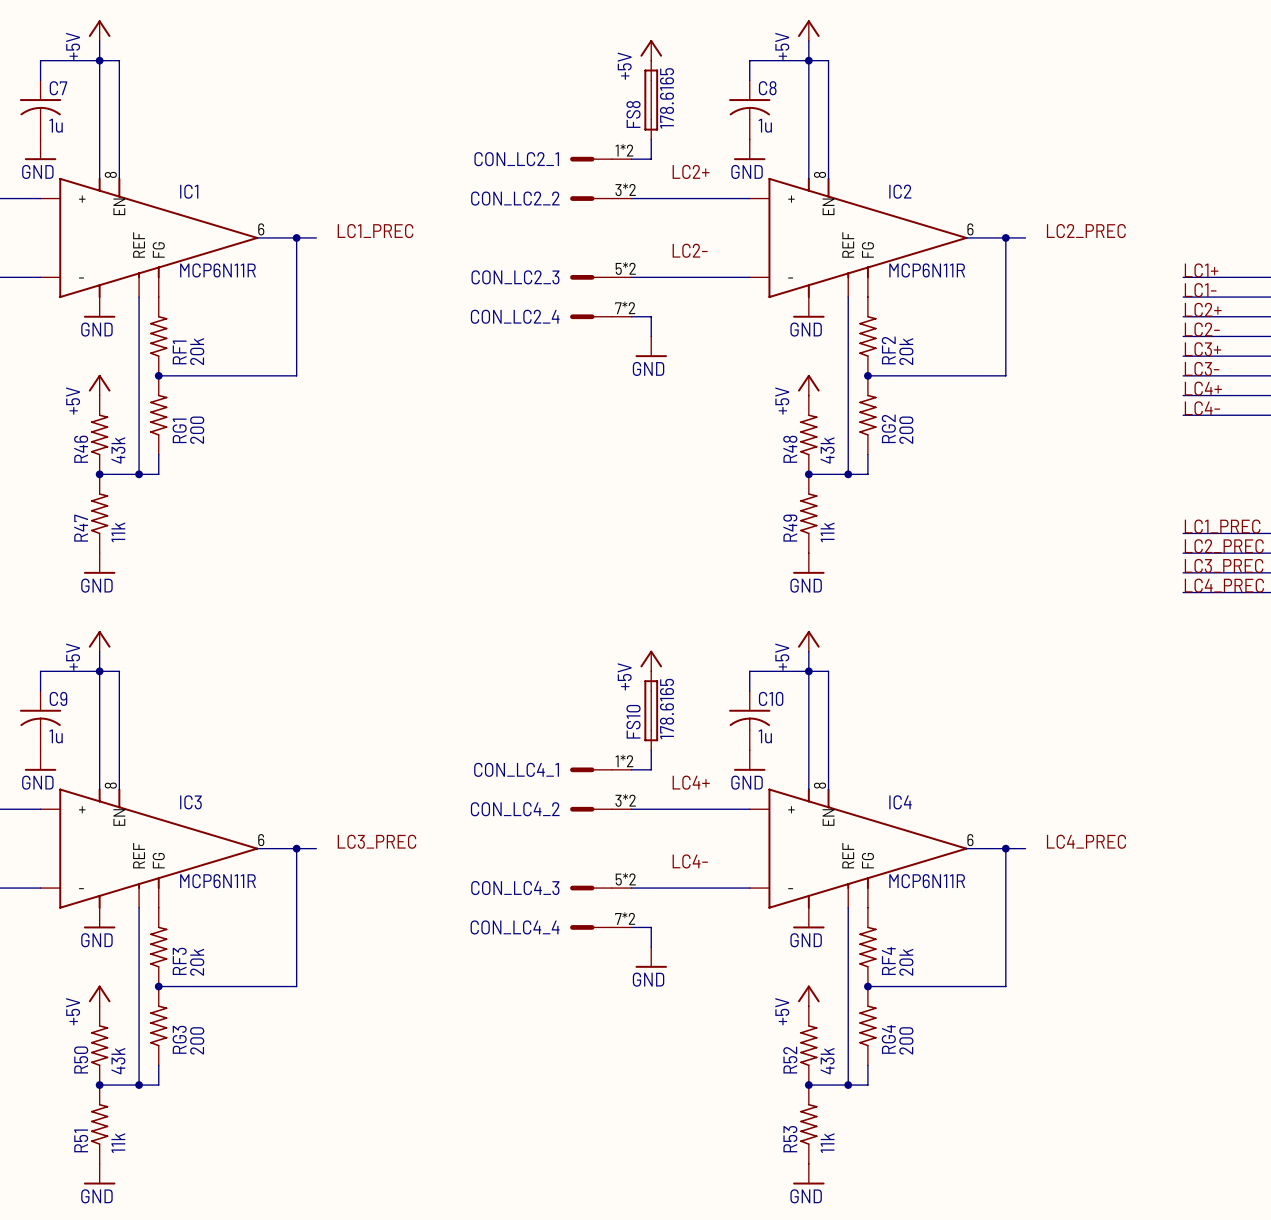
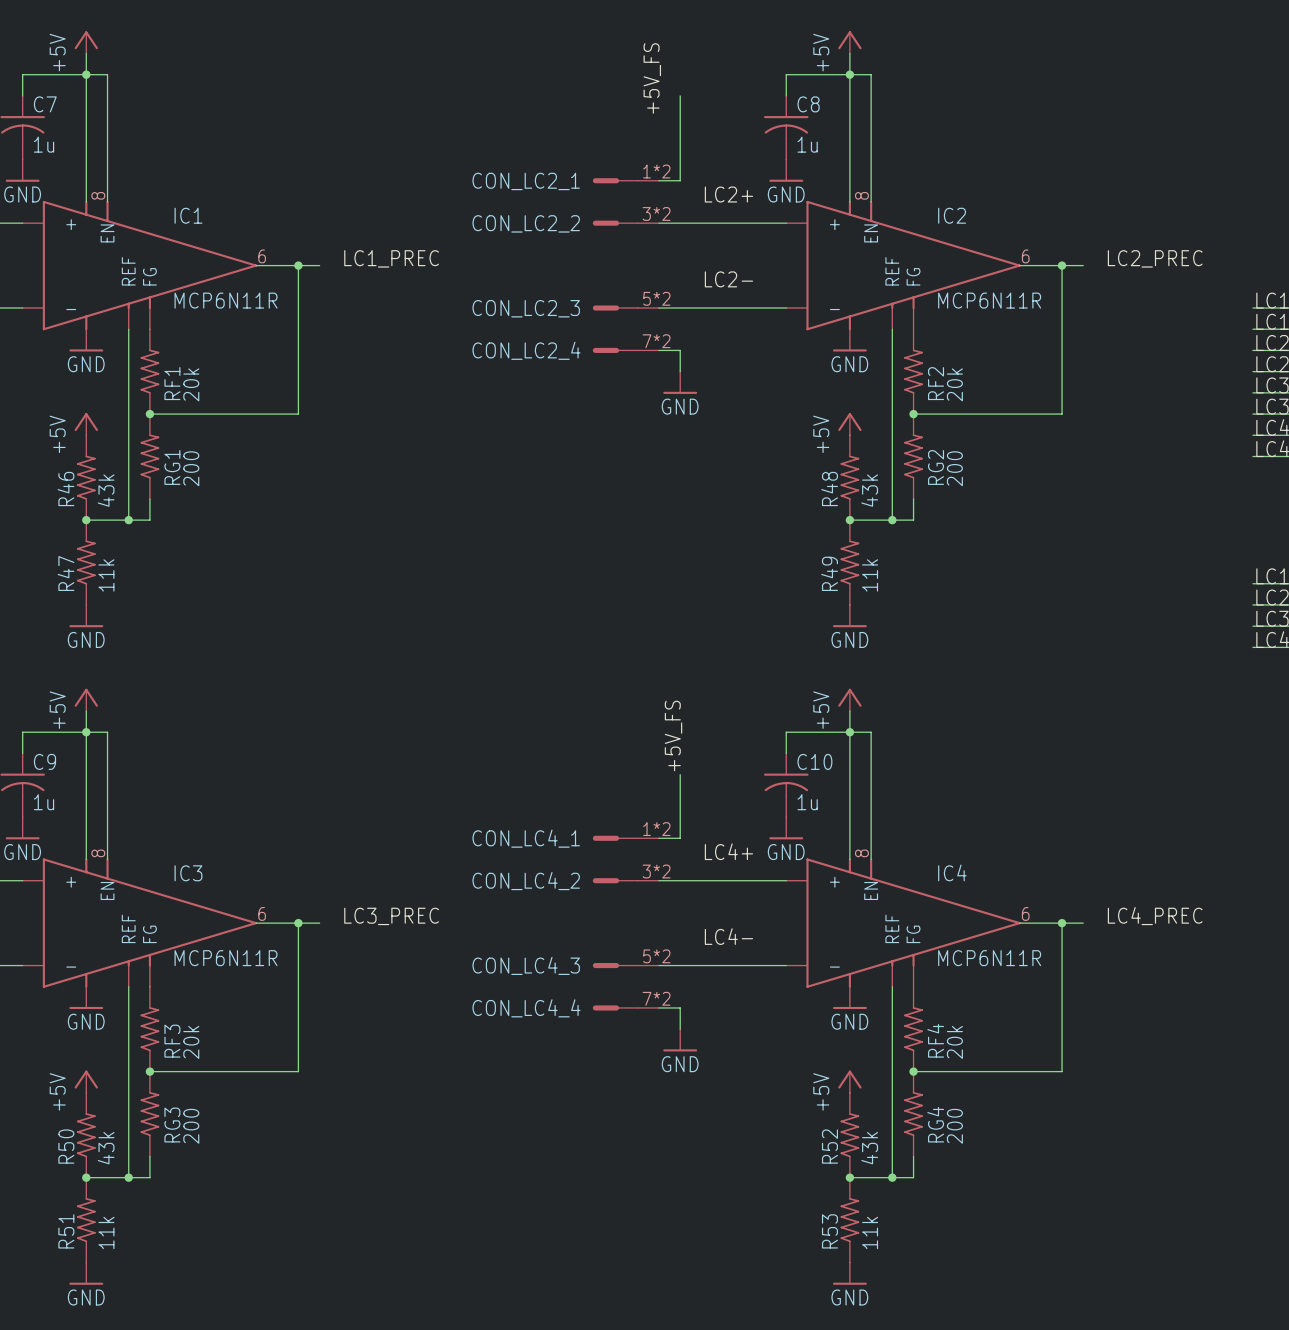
power symbol: +5V (651, 50) -> none
label: none -> +5V_FS (652, 78)
FS8: 178.6165 (651, 100) -> none
power symbol: +5V (651, 661) -> none
label: none -> +5V_FS (673, 736)
FS10: 178.6165 (651, 710) -> none

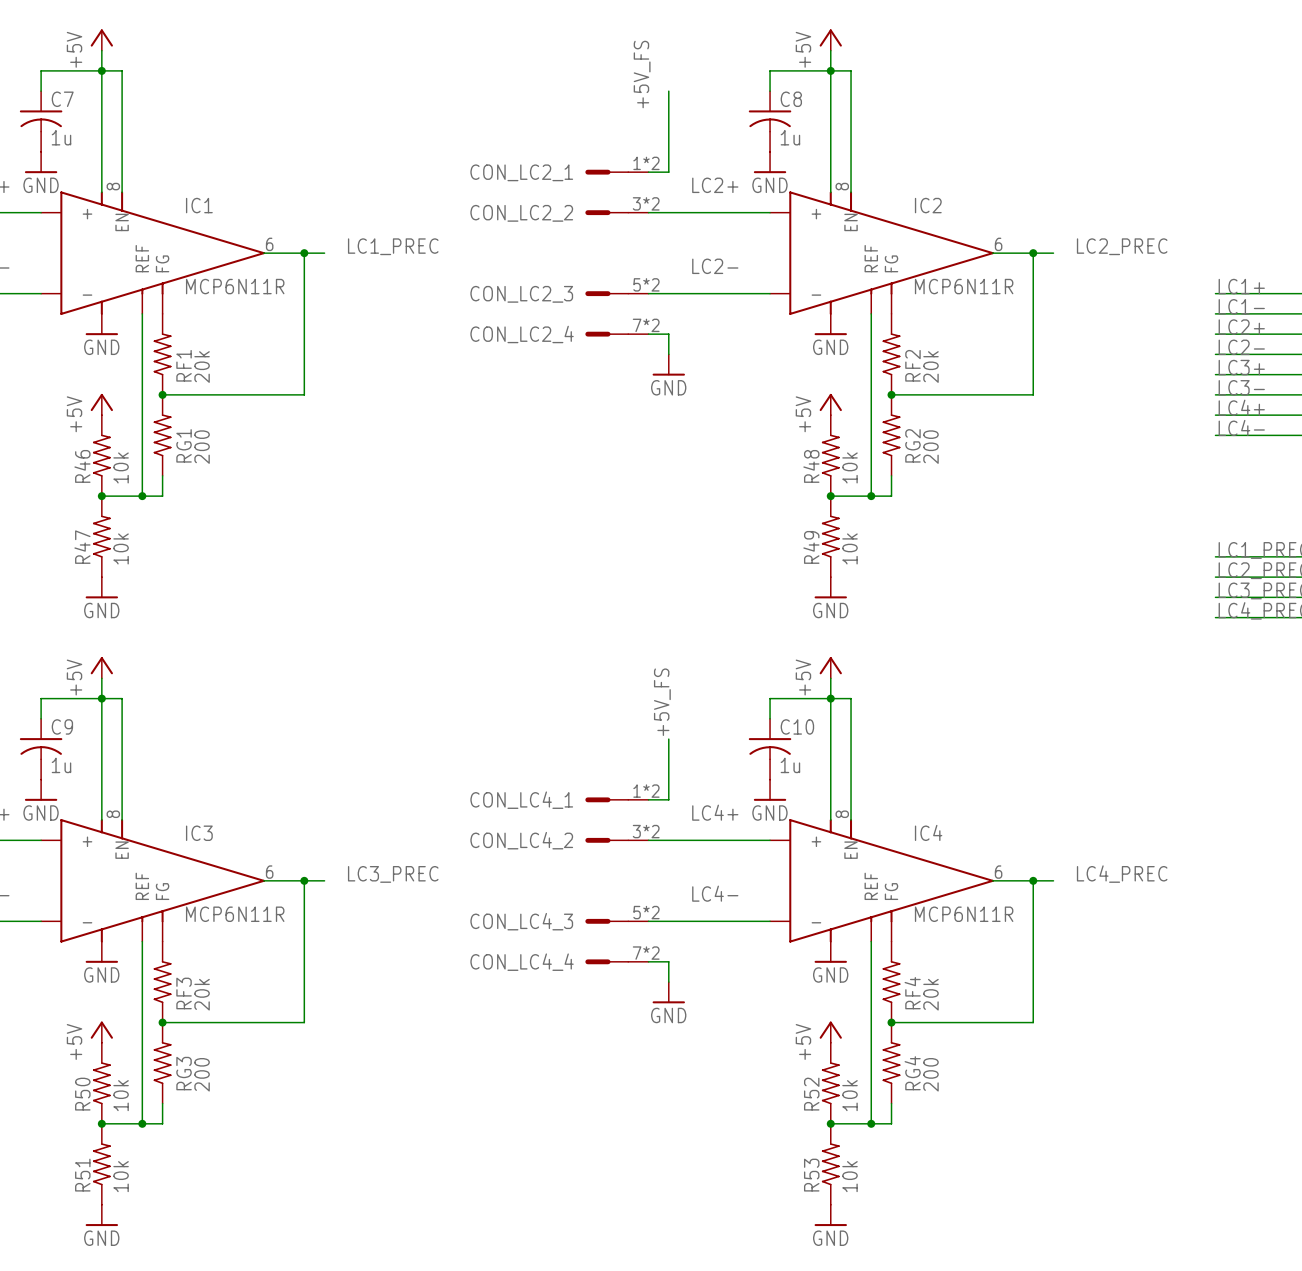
R46 value: 43k (106, 490) -> 10k (121, 467)
R48 value: 43k (869, 490) -> 10k (850, 467)
R47 value: 11k (106, 575) -> 10k (121, 548)
R49 value: 11k (870, 575) -> 10k (850, 548)
R50 value: 43k (106, 1148) -> 10k (121, 1095)
R52 value: 43k (869, 1148) -> 10k (850, 1095)
R51 value: 11k (106, 1232) -> 10k (121, 1176)
R53 value: 11k (870, 1232) -> 10k (850, 1176)

